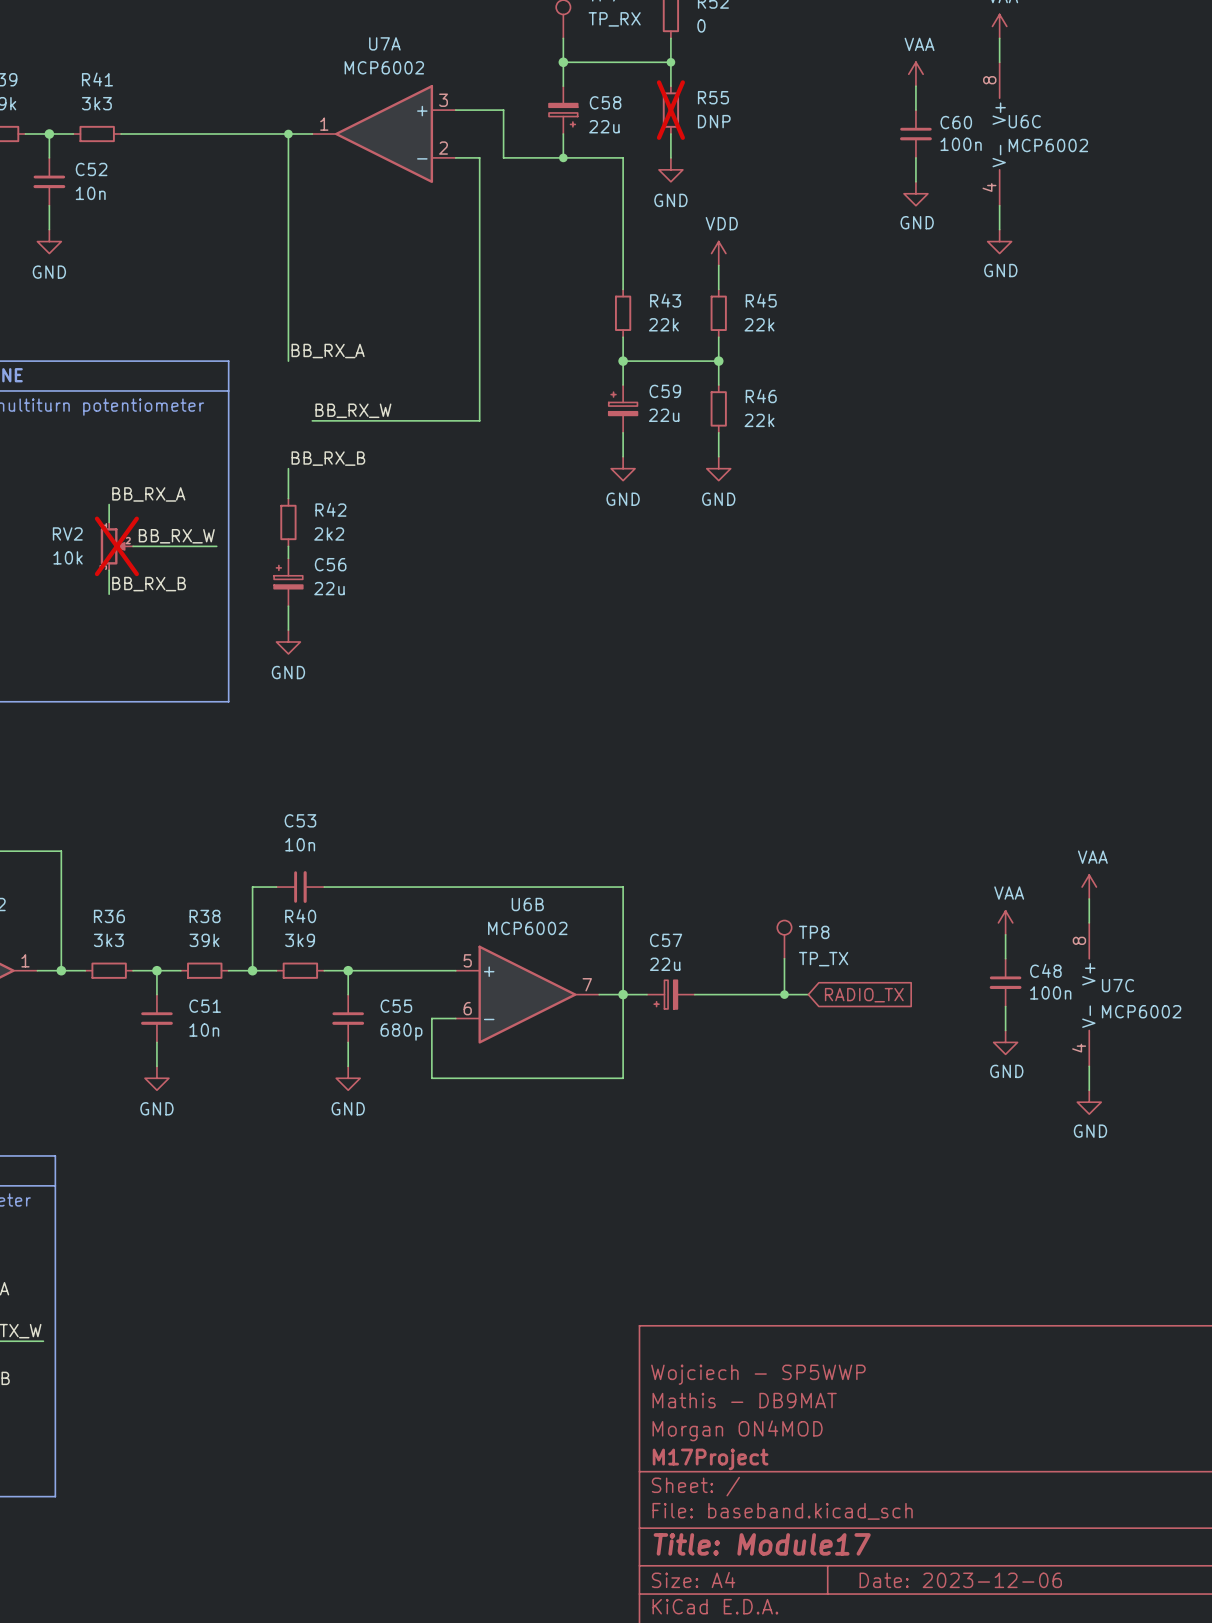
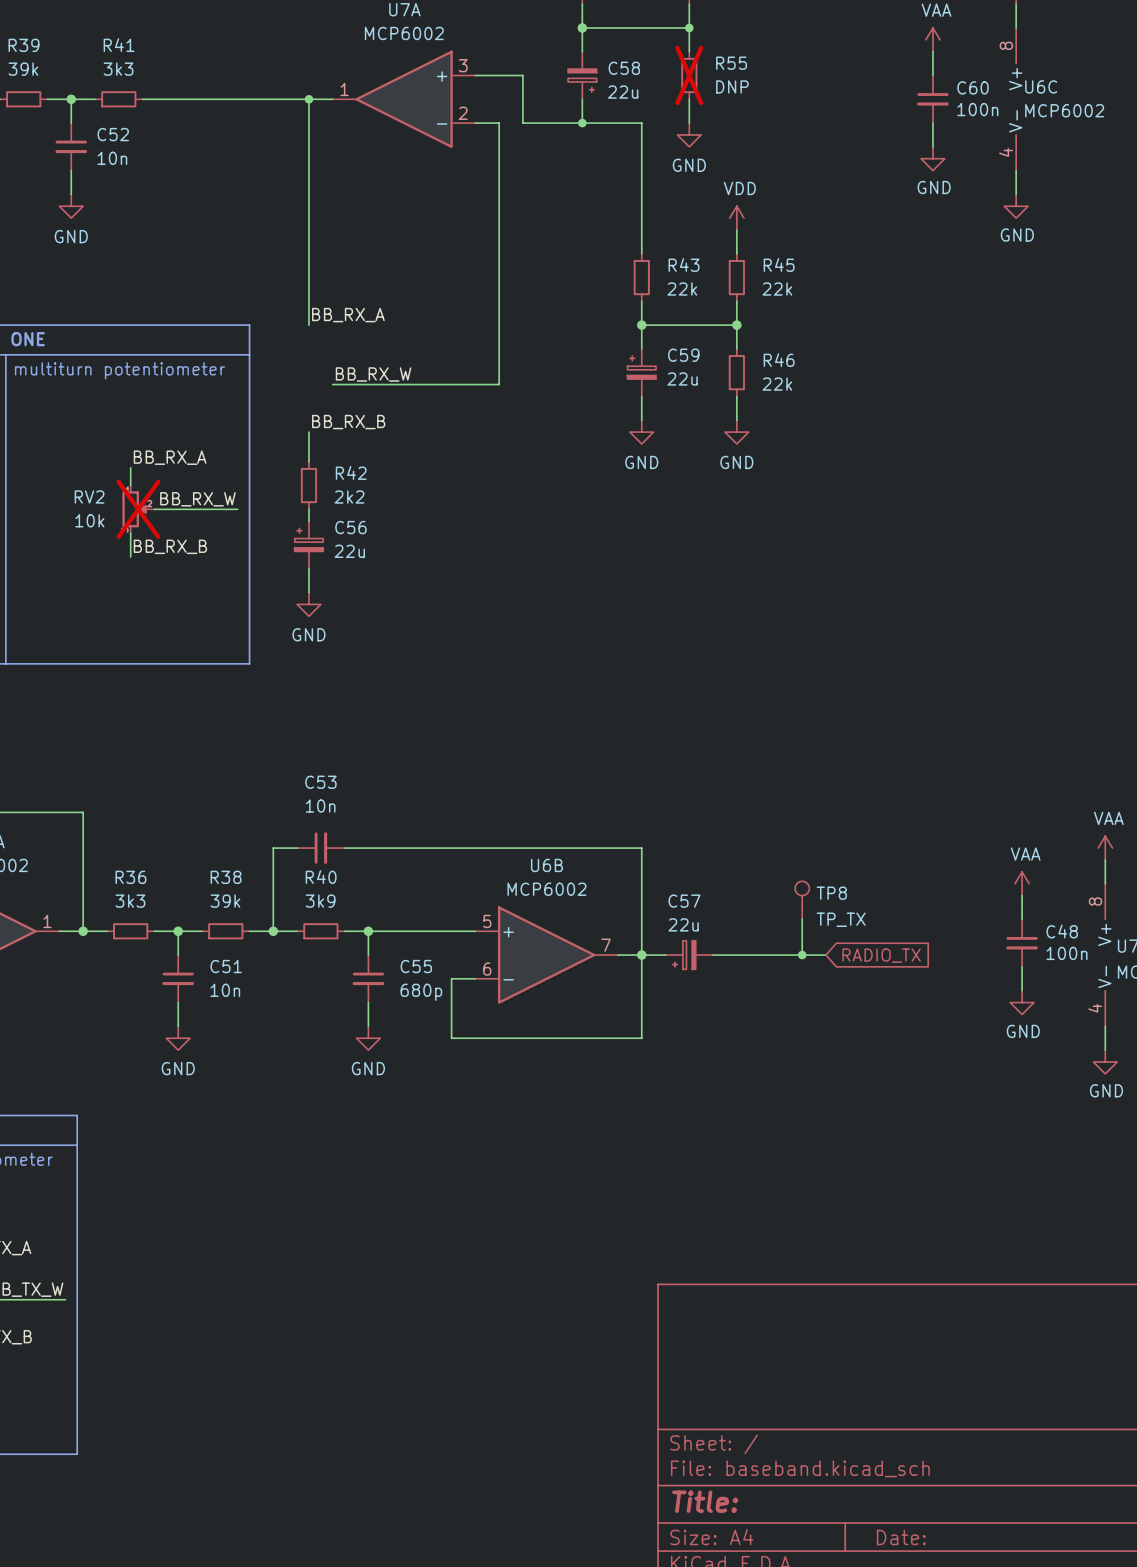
title block: Wojciech - SP5WWP (758, 1374) -> none
title block: Mathis - DB9MAT (744, 1400) -> none
title block: Morgan ON4MOD (737, 1430) -> none
title block: M17Project (710, 1459) -> none
title block: Title: Module17 (762, 1544) -> Title: (705, 1501)
title block: Date: 2023-12-06 (960, 1580) -> Date: (901, 1537)

